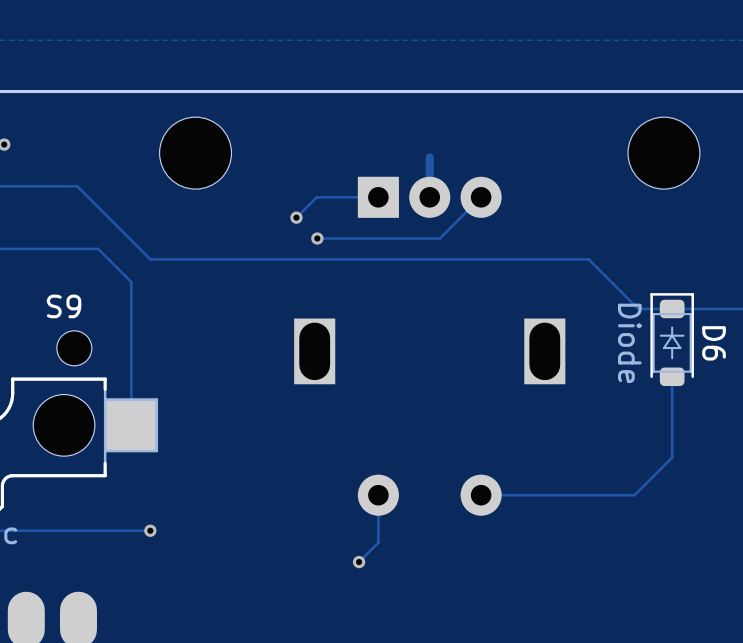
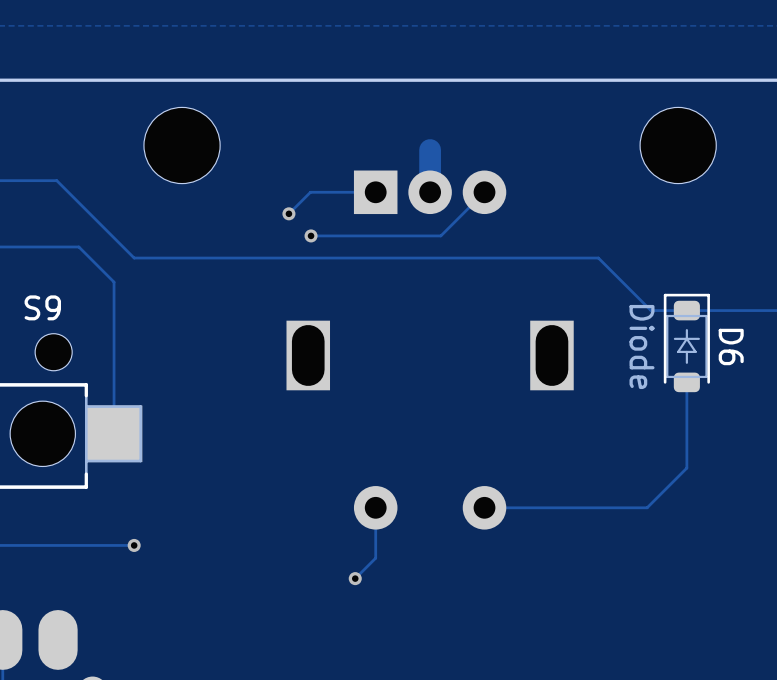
track width: thin (429, 157) (429, 197) -> thick (430, 150) (430, 192)

